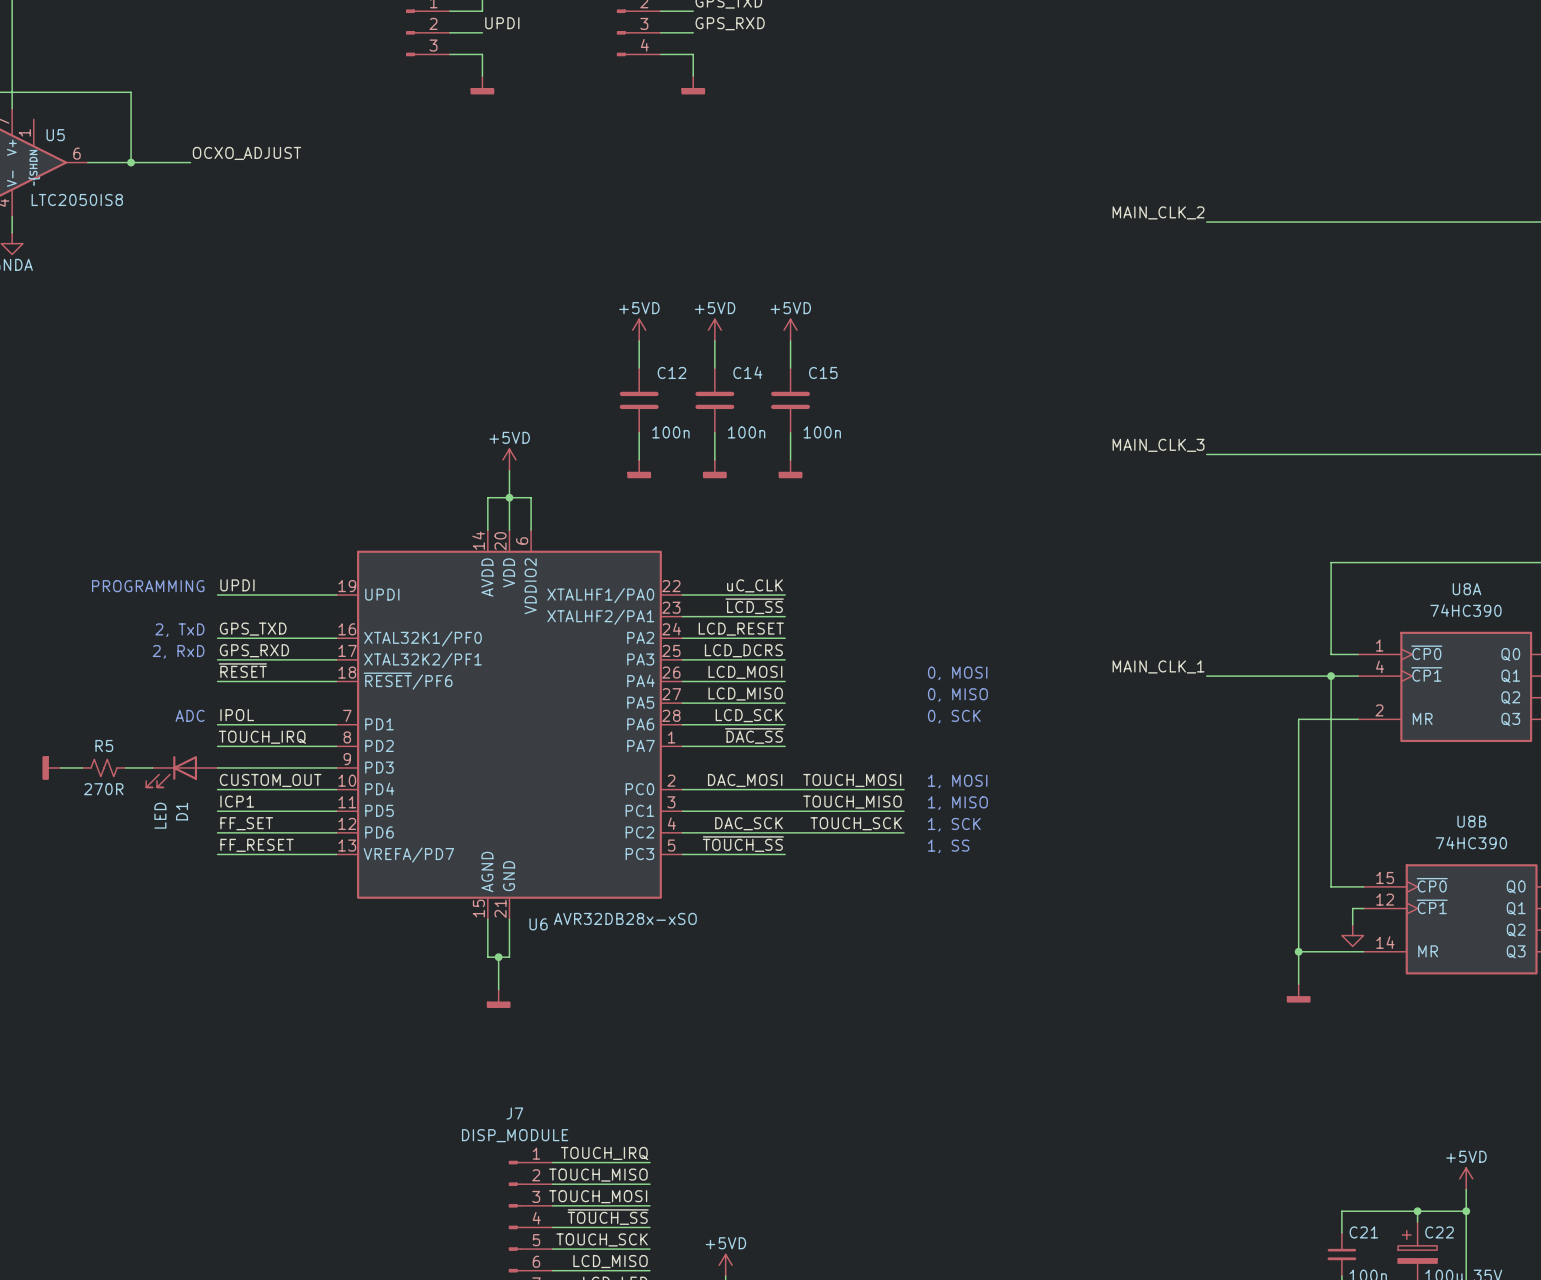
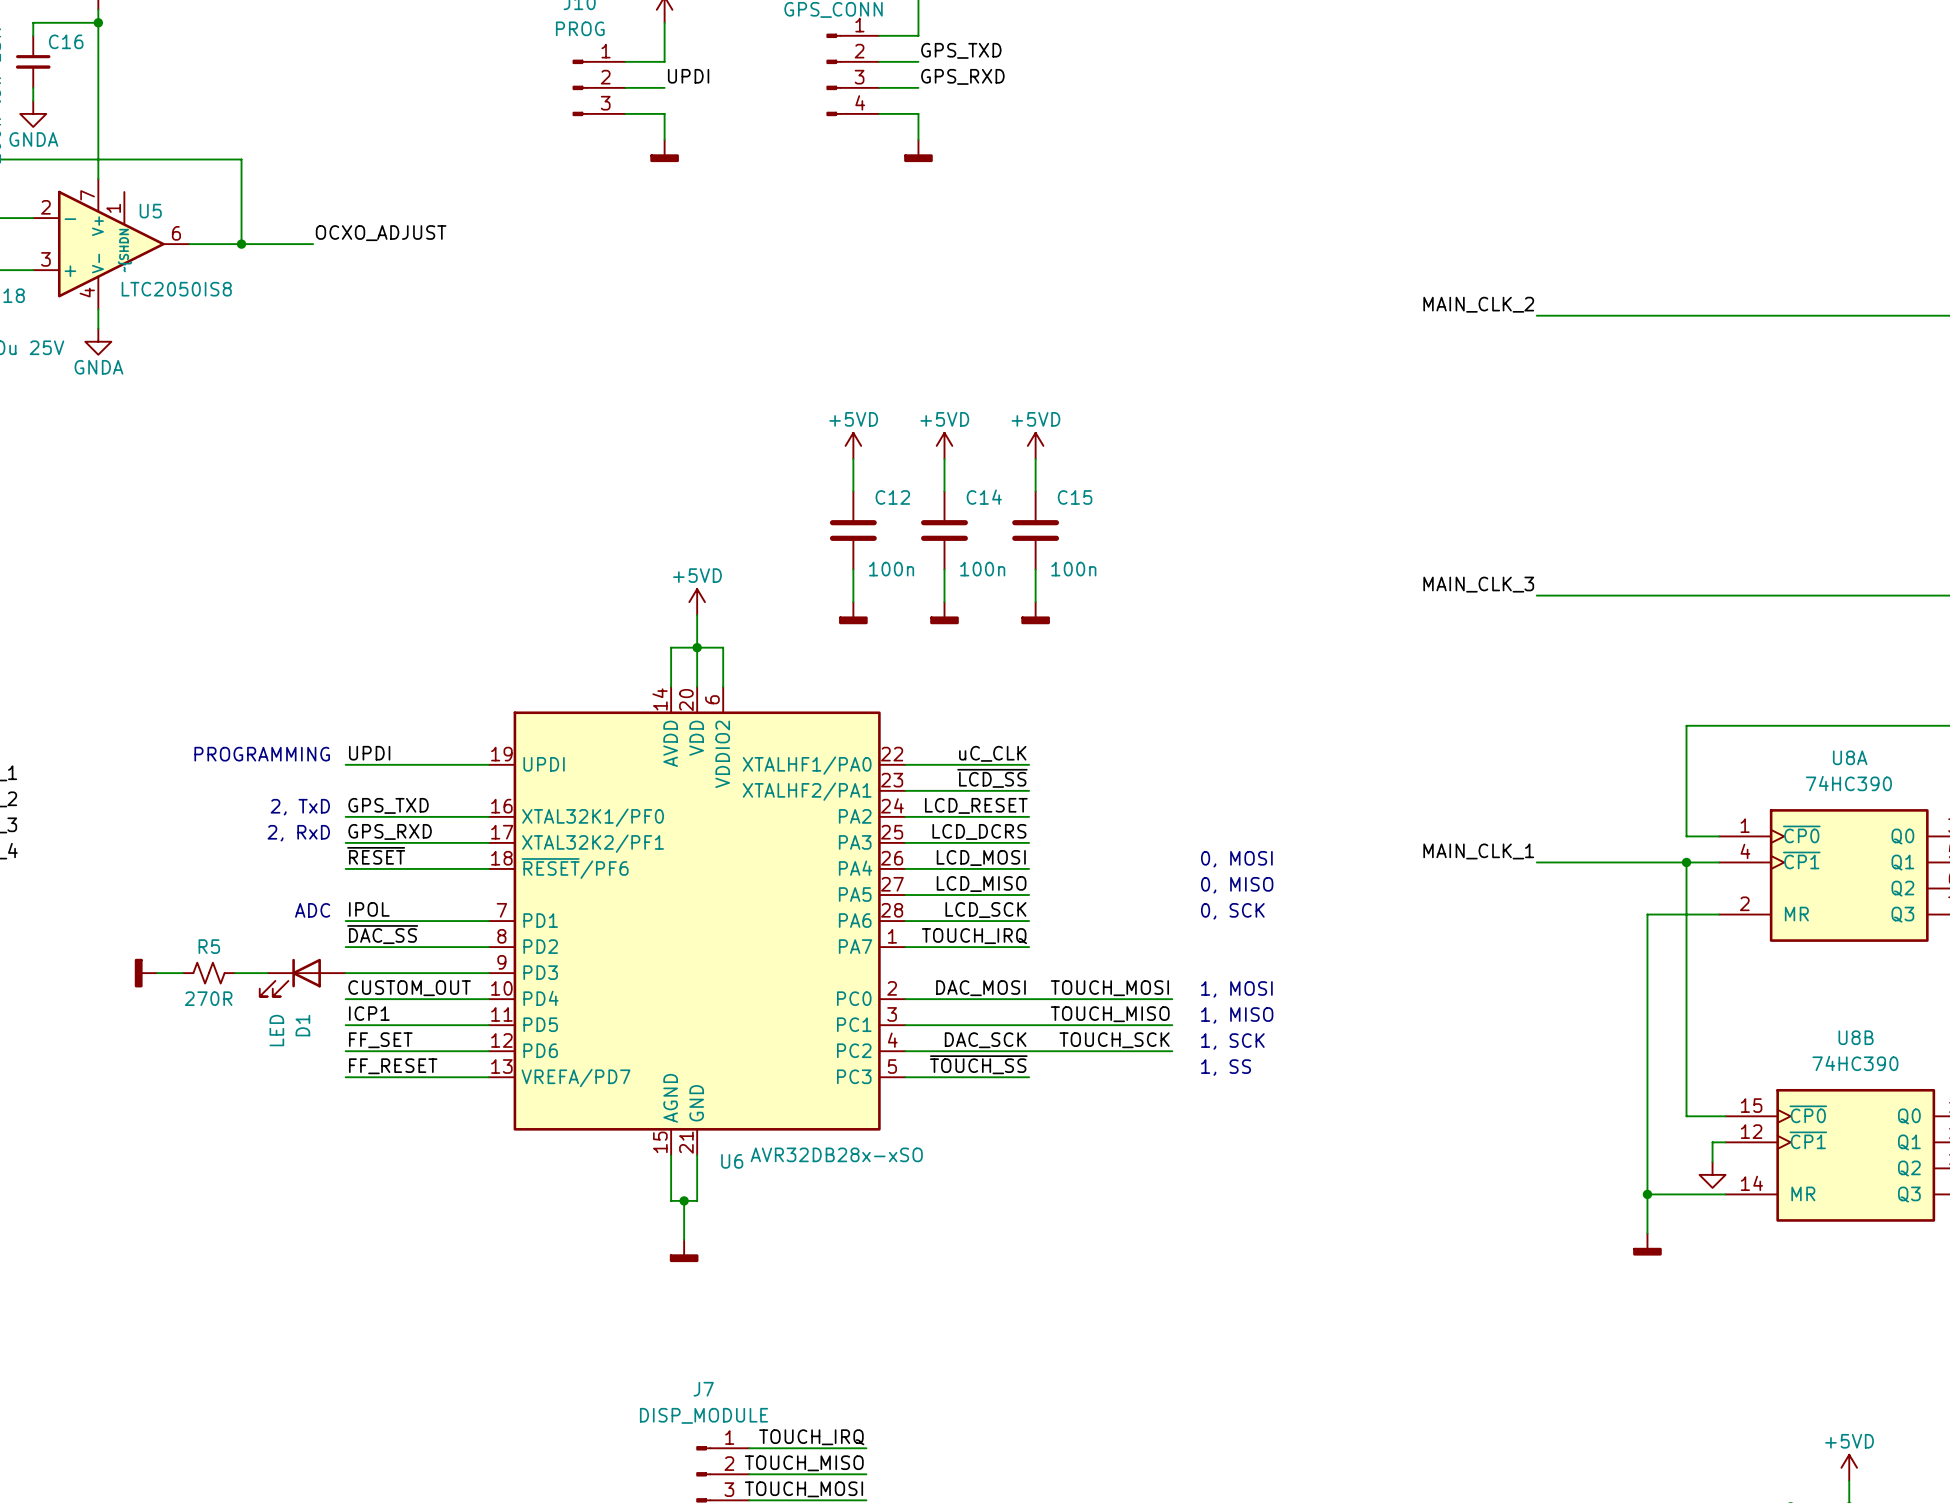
label: ~{DAC_SS} (754, 735) -> TOUCH_IRQ (974, 936)
label: TOUCH_IRQ (262, 737) -> ~{DAC_SS} (382, 934)

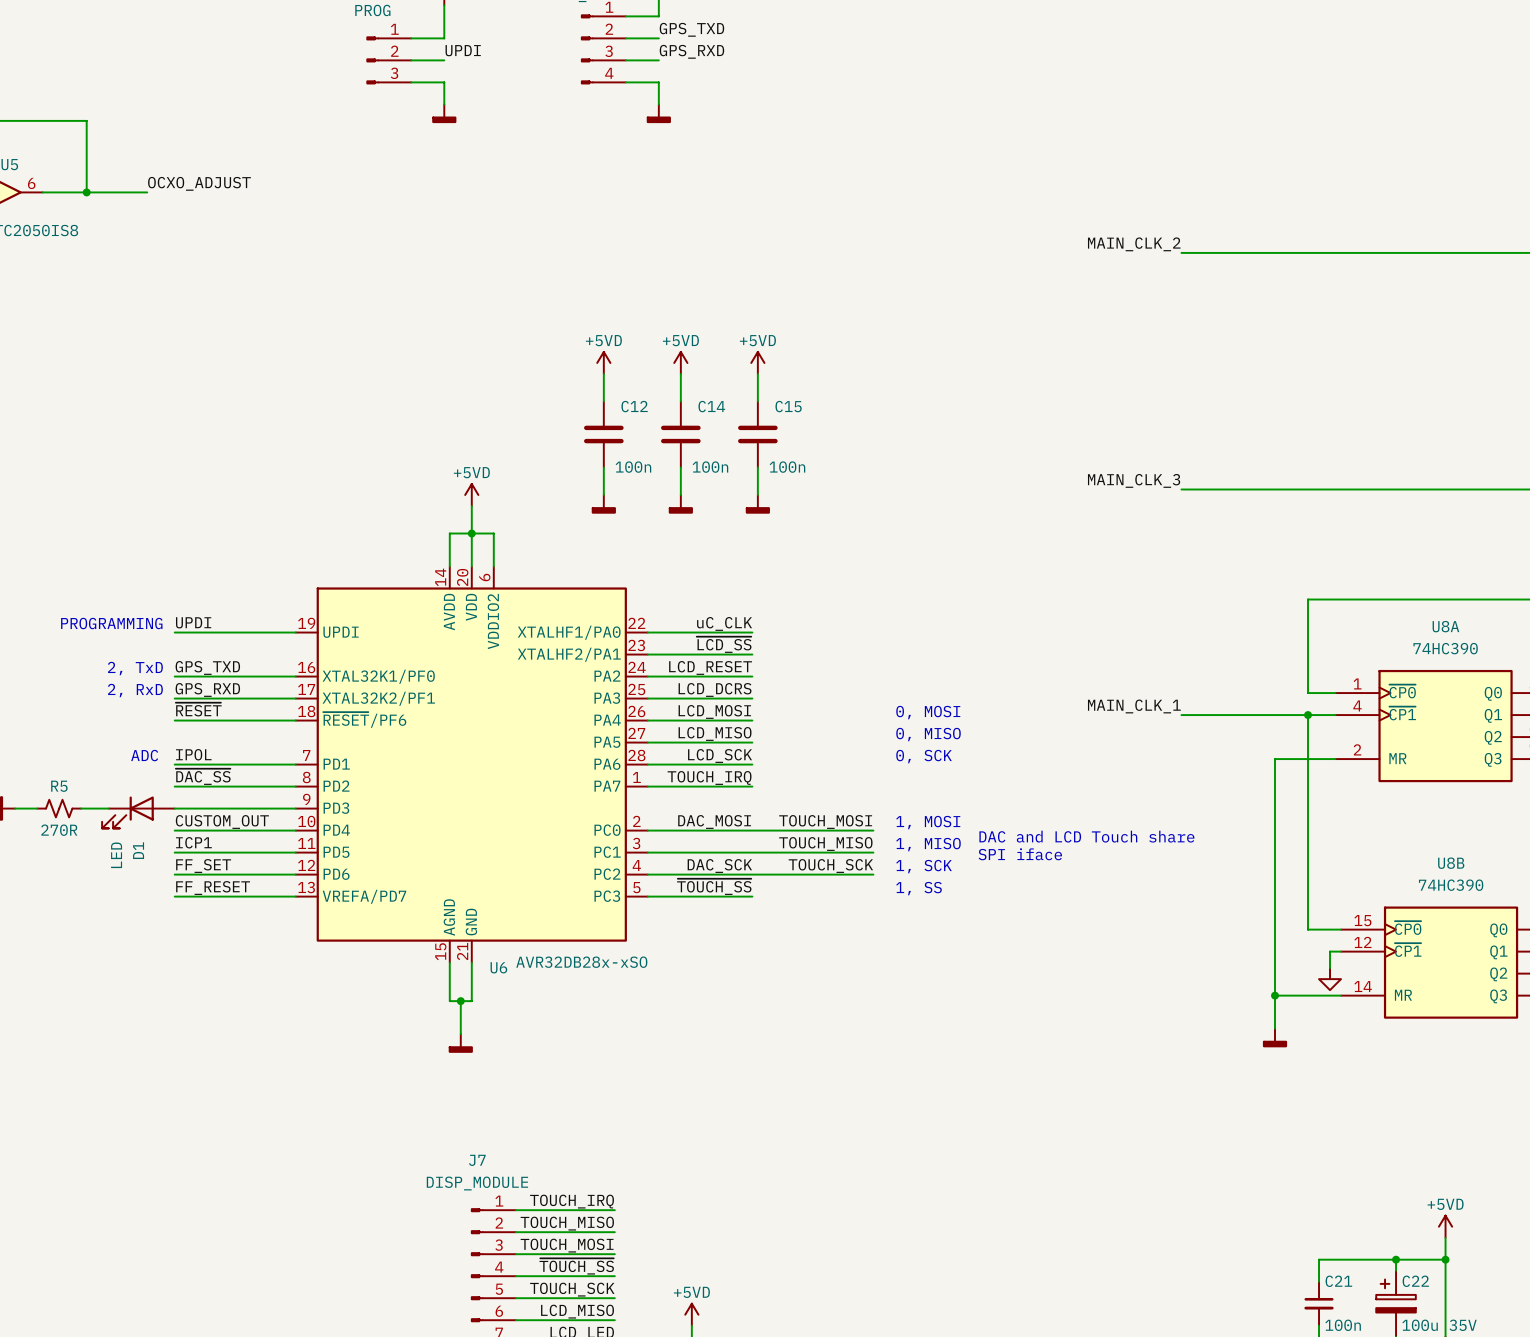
text: none -> DAC and LCD Touch share (1086, 836)
text: none -> SPI iface (1020, 854)

